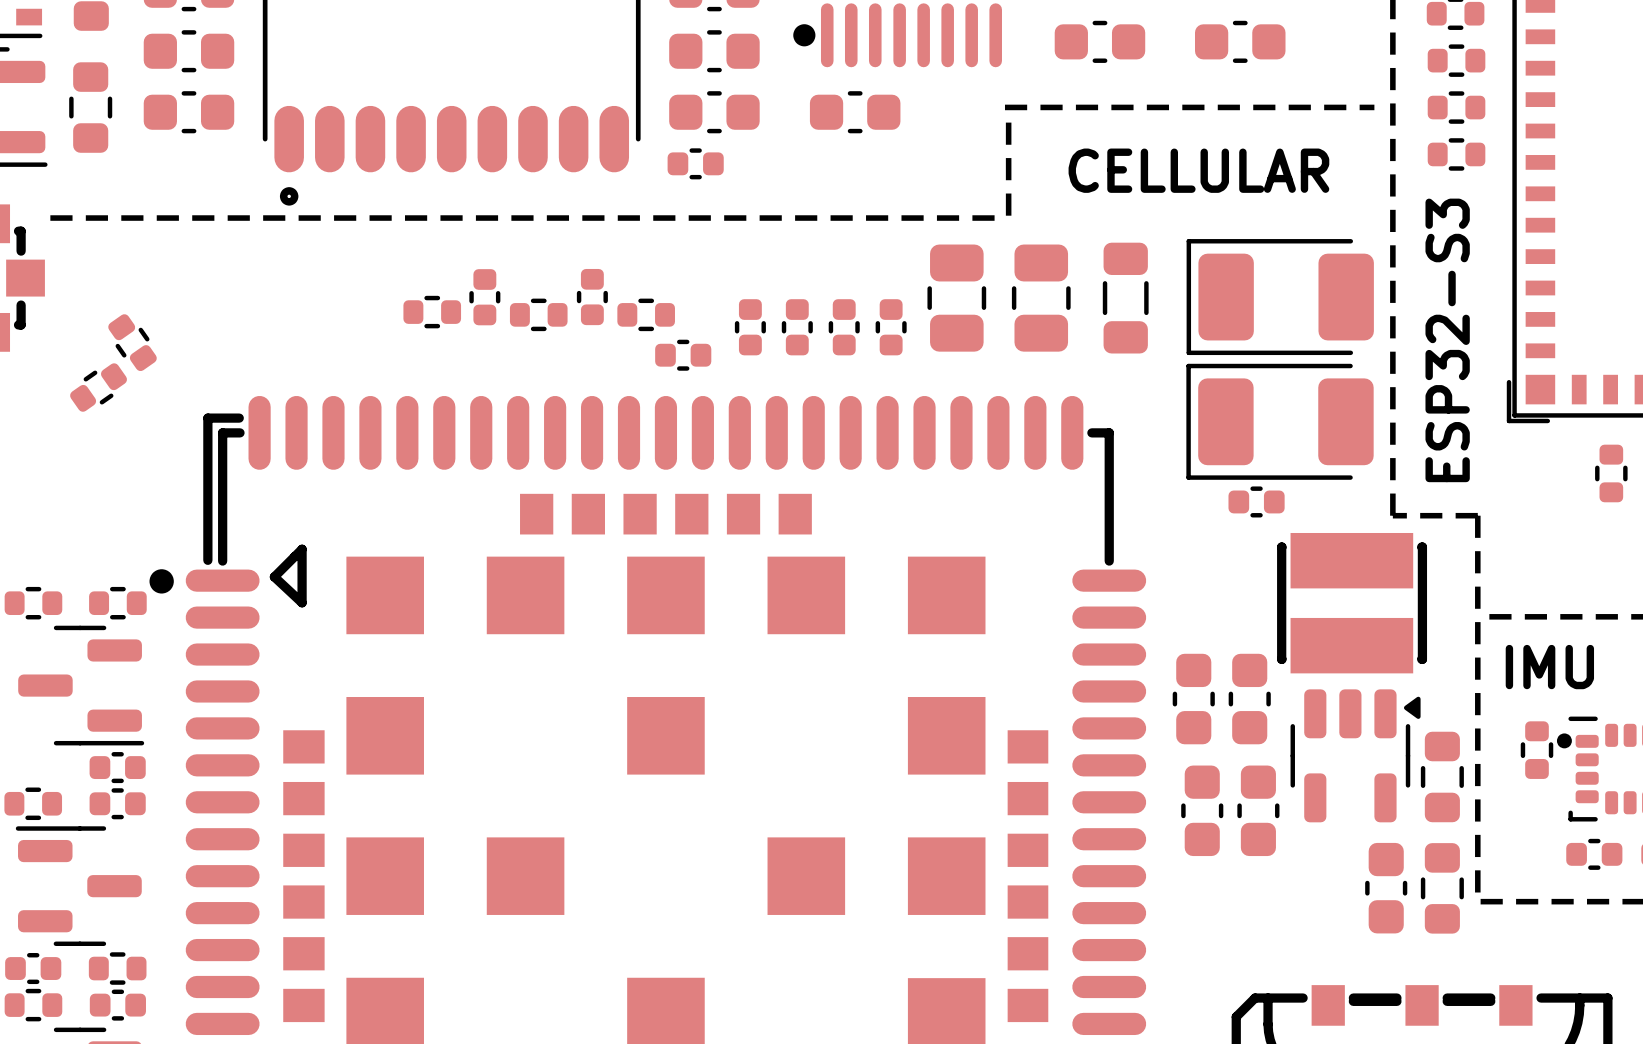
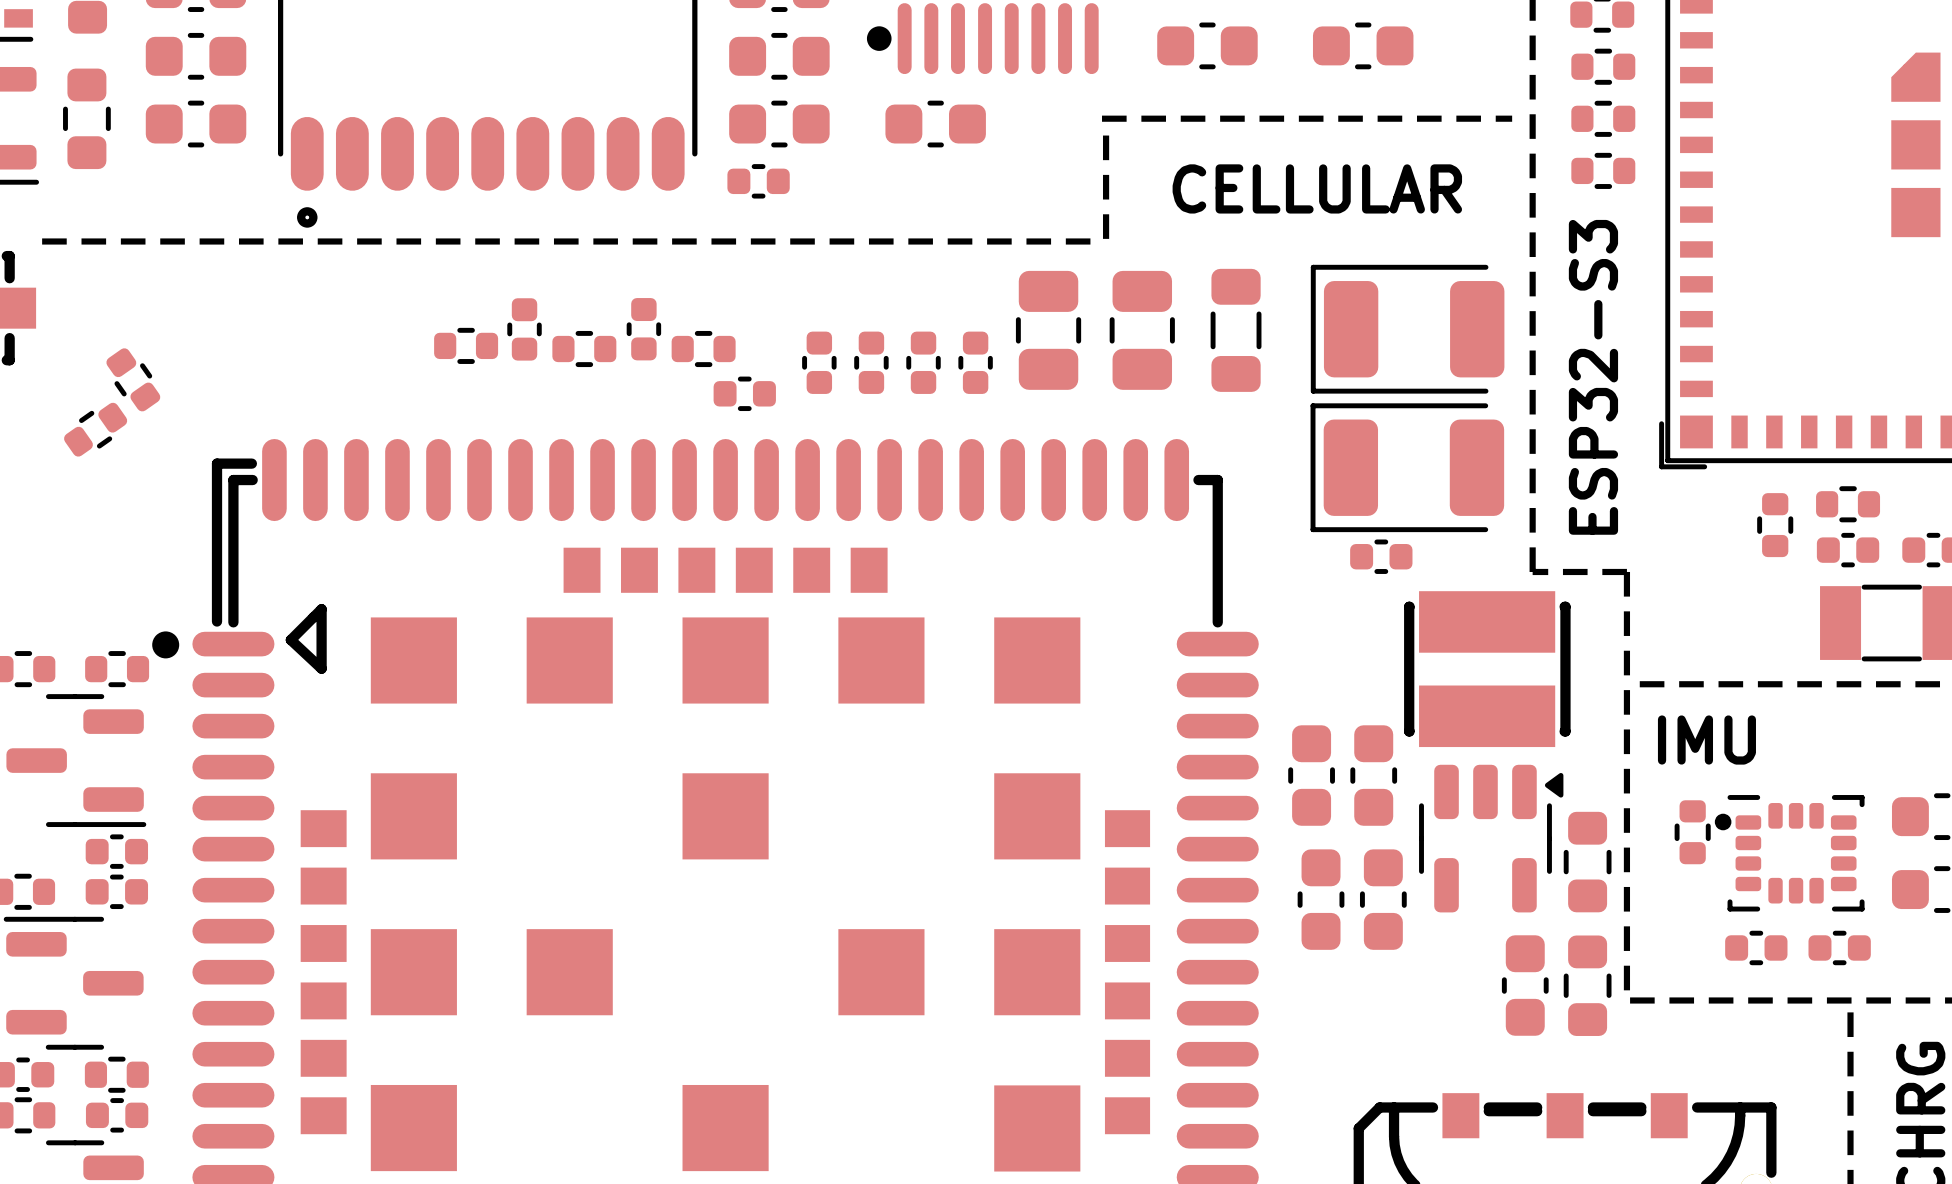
part footprint: [1186, 239, 1374, 356] -> [1310, 264, 1505, 394]
part footprint: [1186, 363, 1374, 480] -> [1310, 403, 1505, 533]

